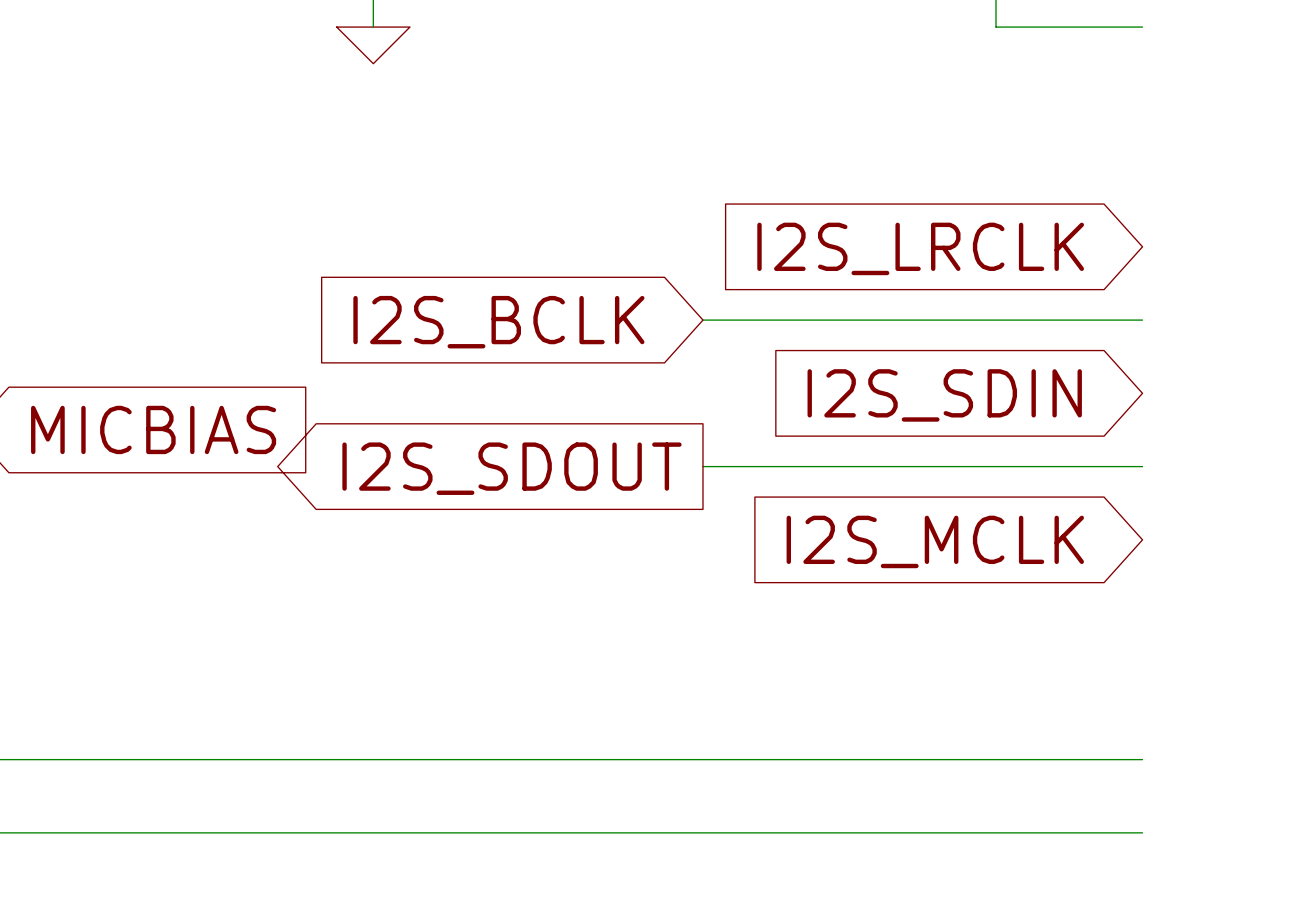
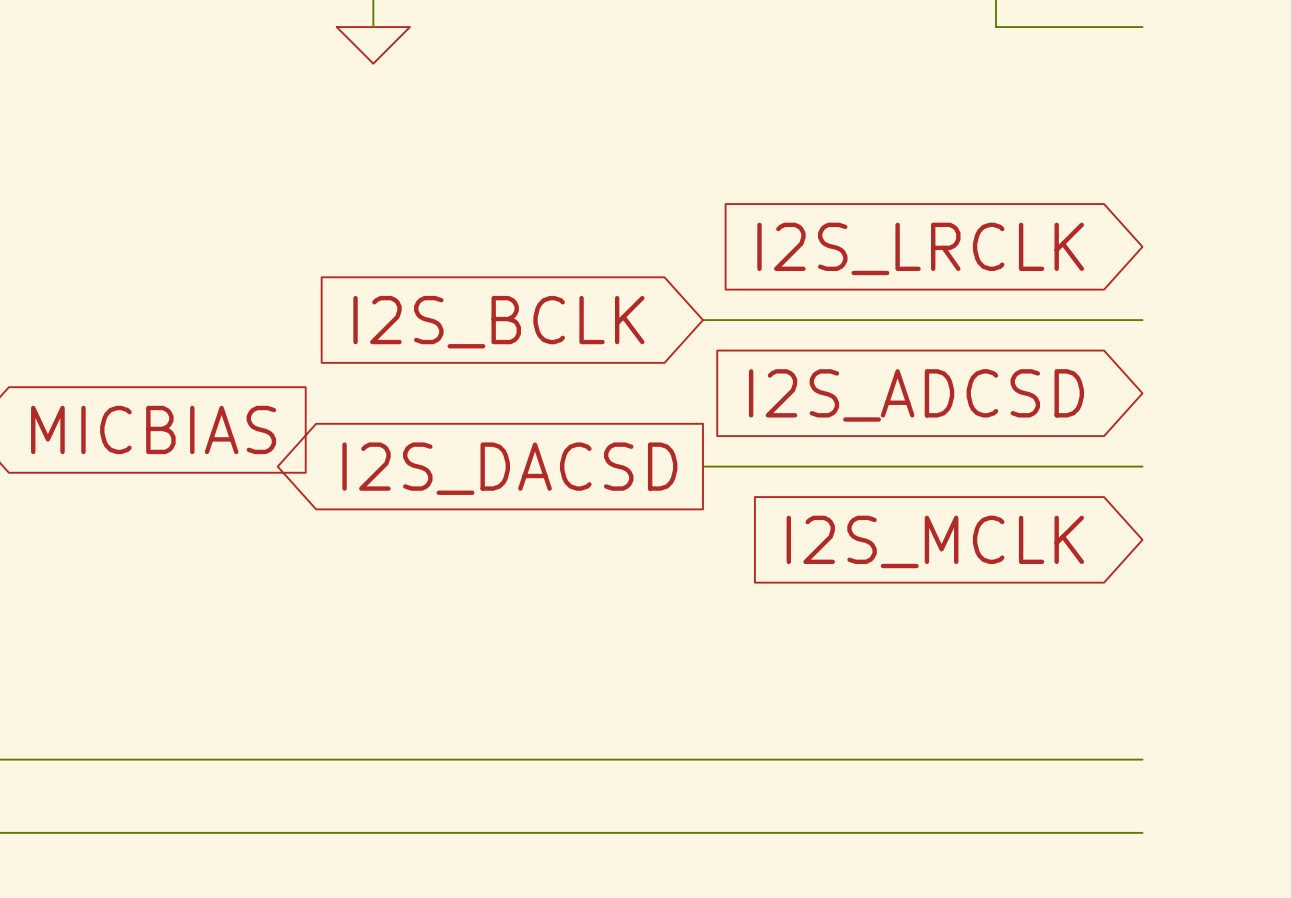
global label: I2S_SDIN (944, 395) -> I2S_ADCSD (916, 395)
global label: I2S_SDOUT (511, 468) -> I2S_DACSD (509, 468)

